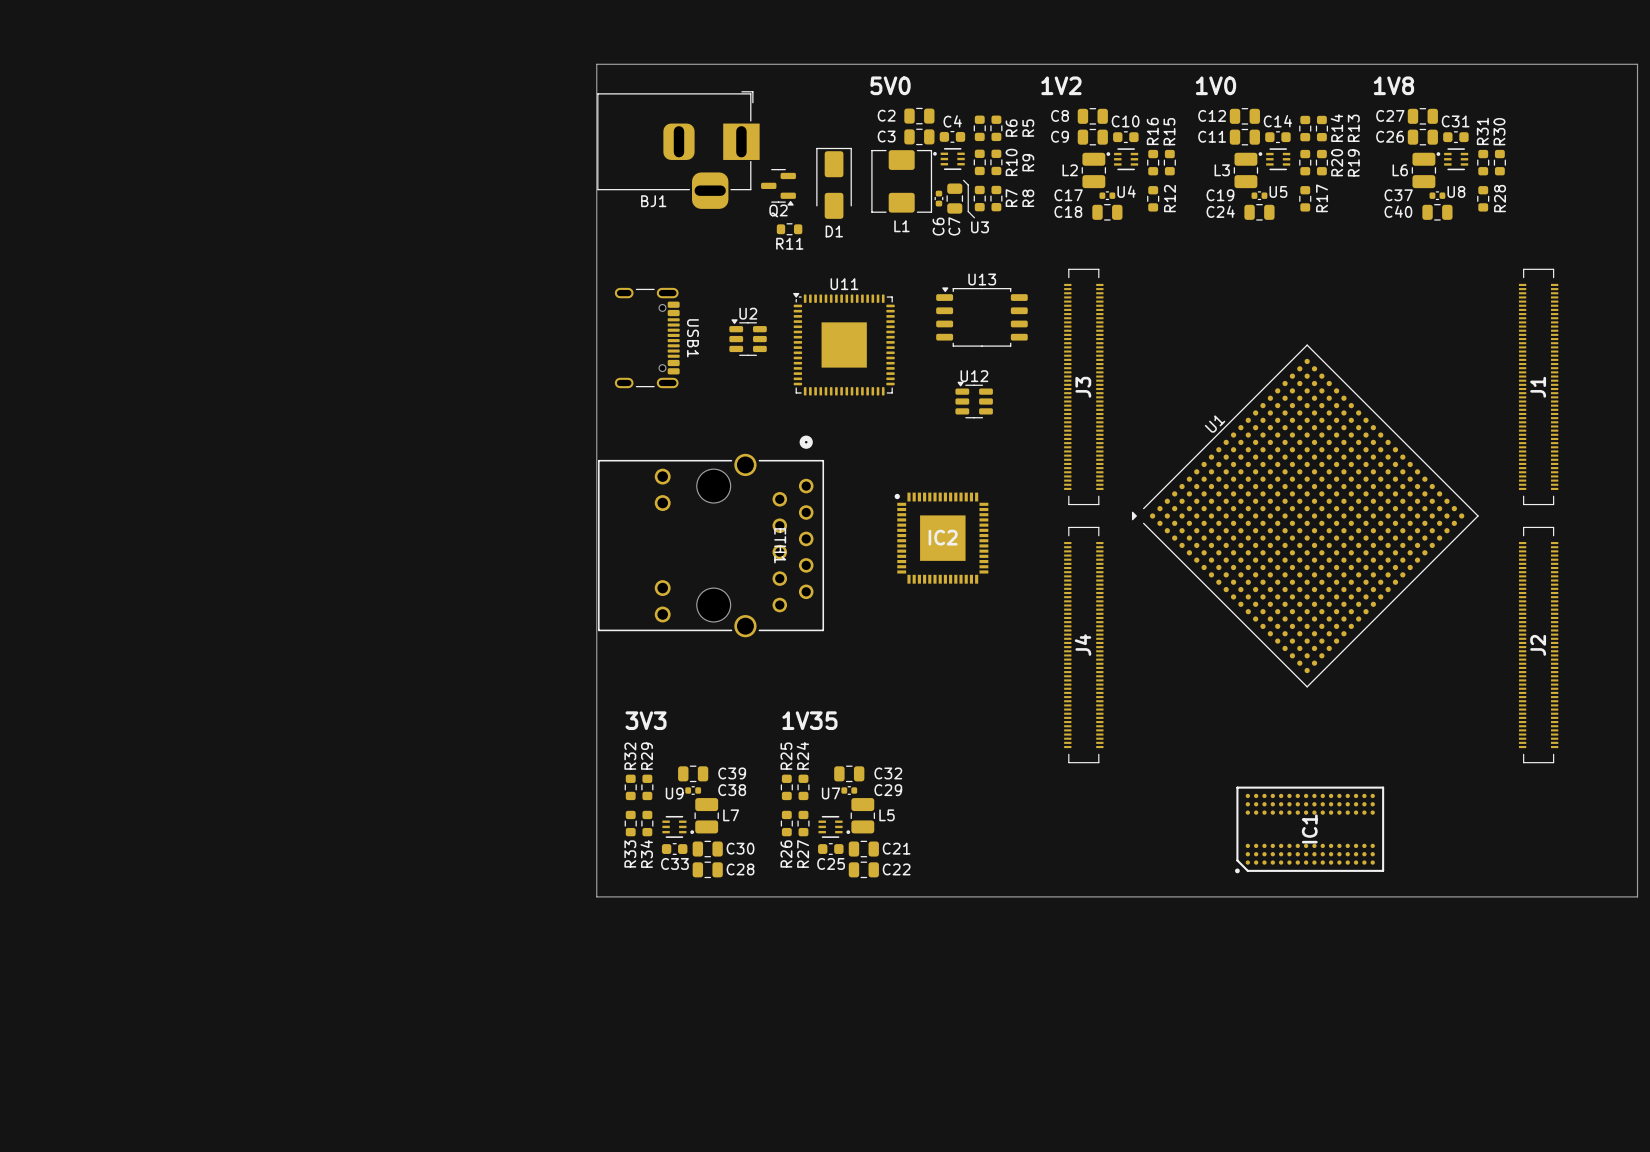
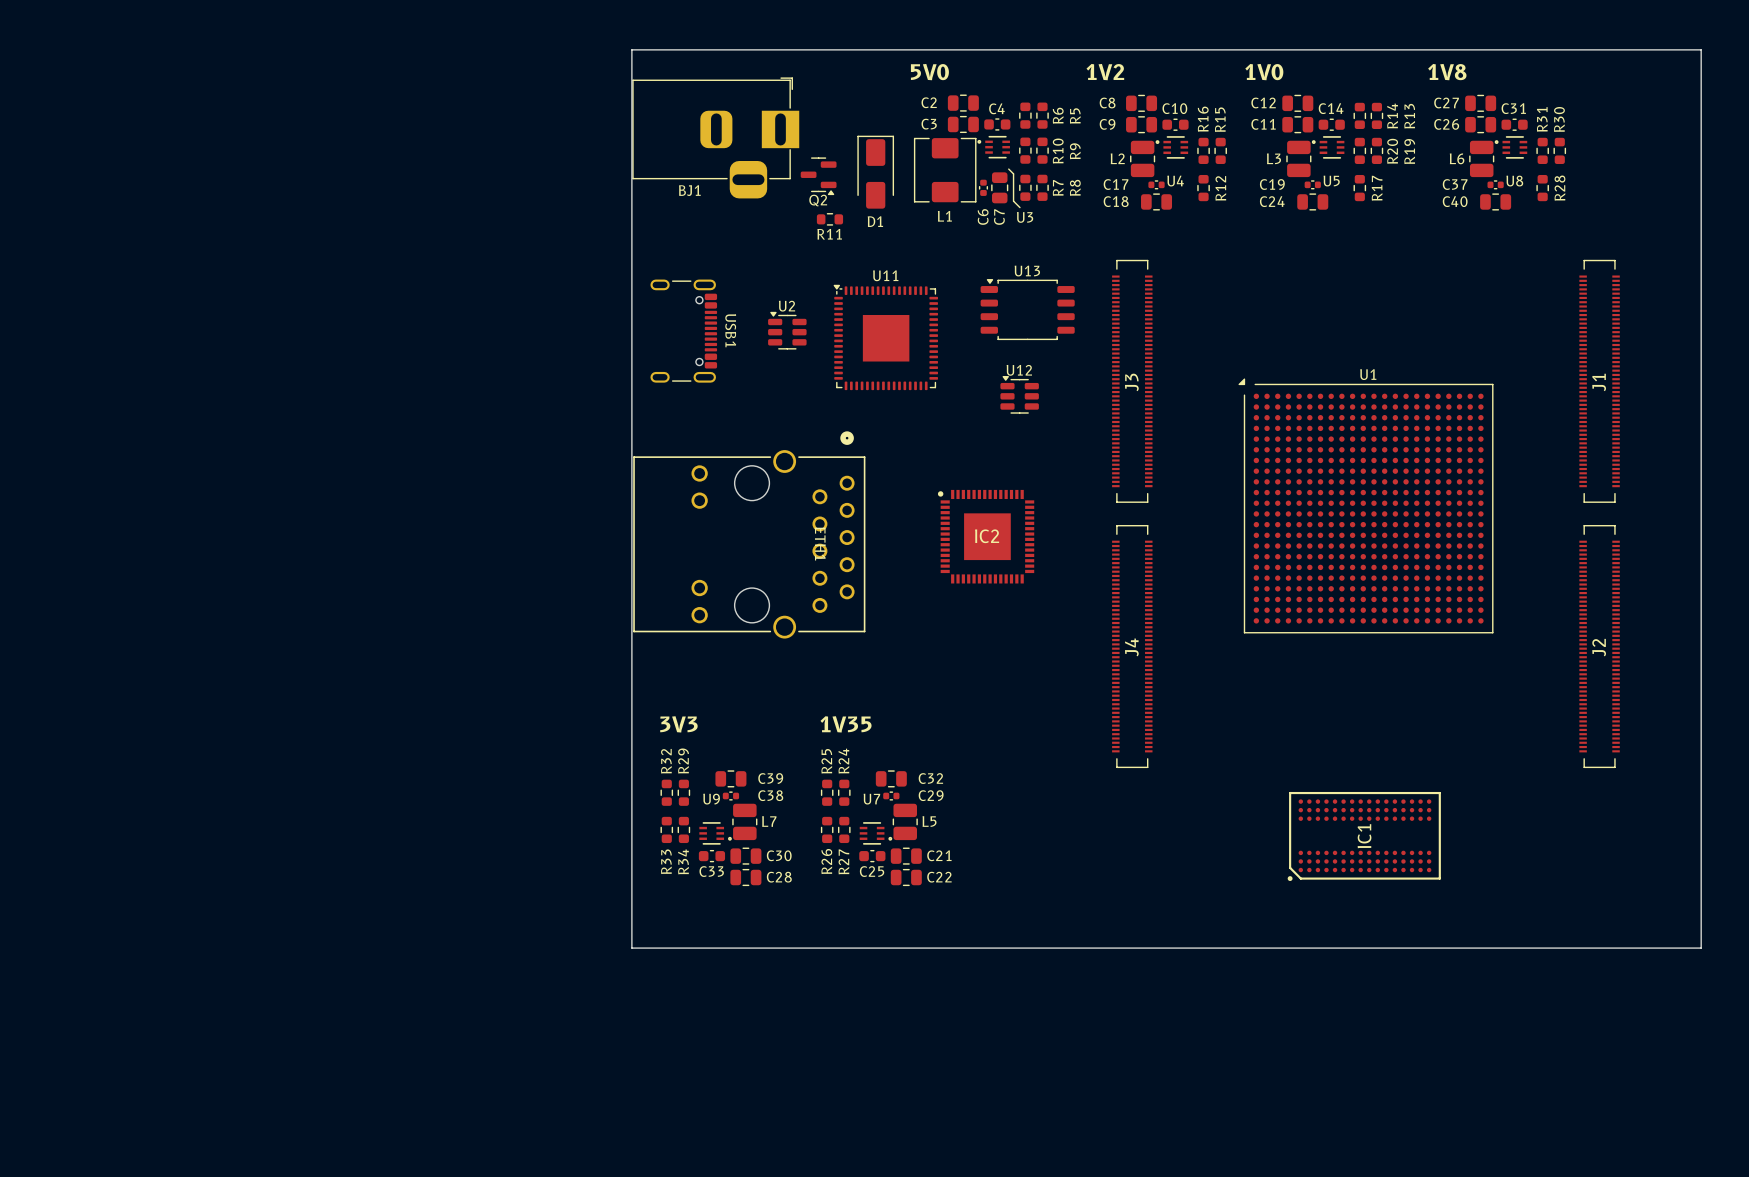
U1 rotation: 0° (1305, 515) -> 45° clockwise (1365, 505)
board edge: (596, 896) (1637, 896) -> (631, 905) (631, 948) (1701, 948) (1701, 905)

